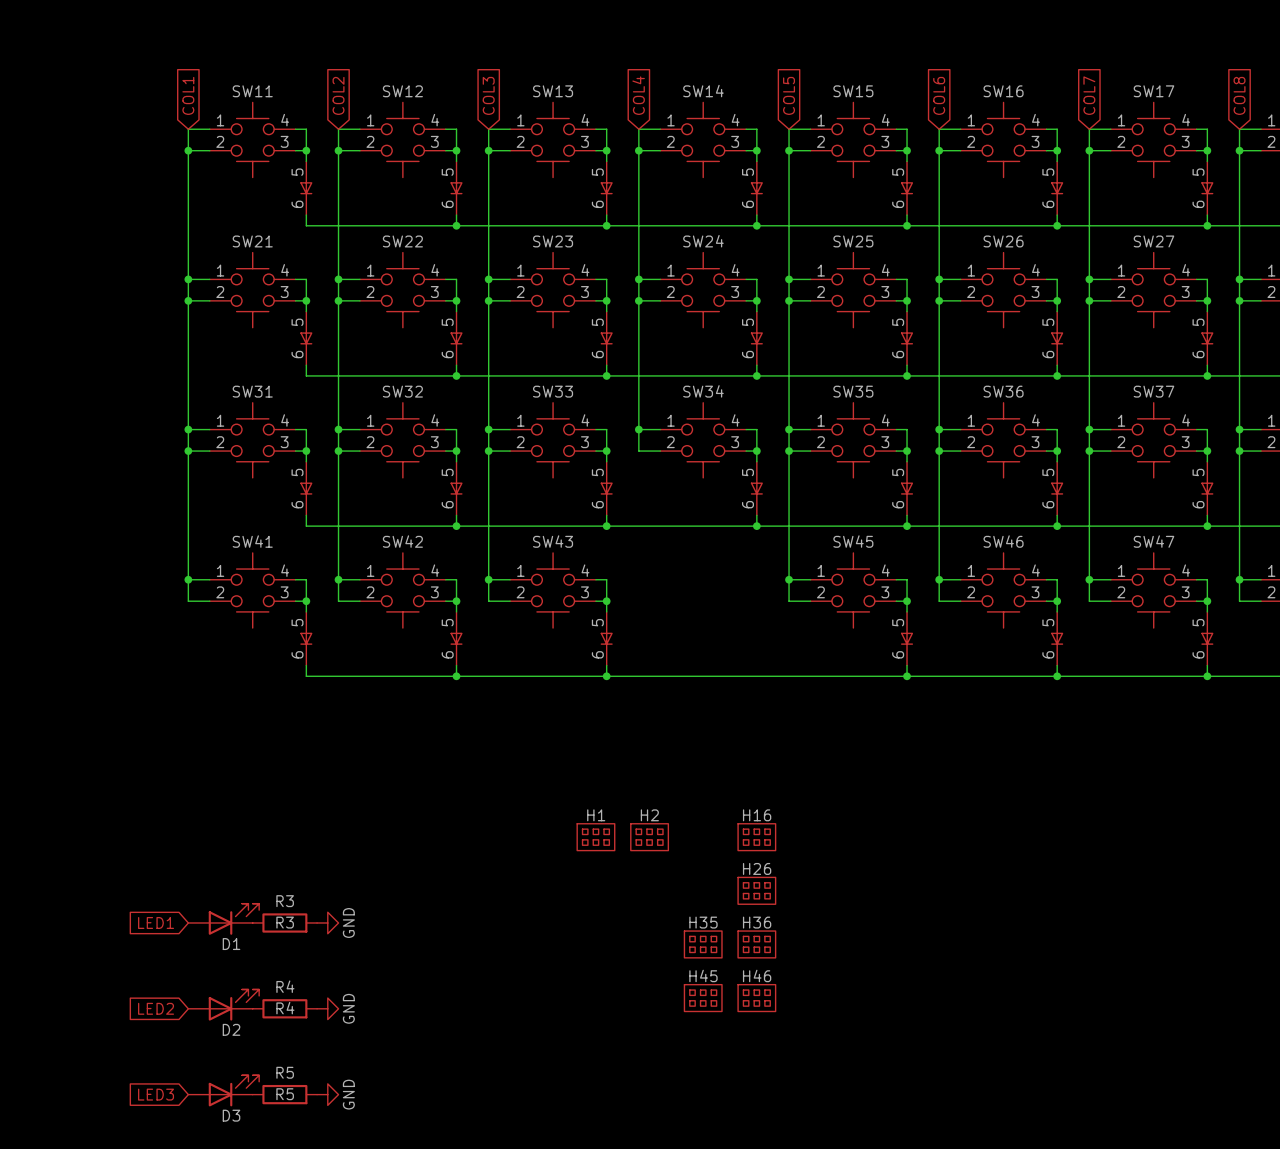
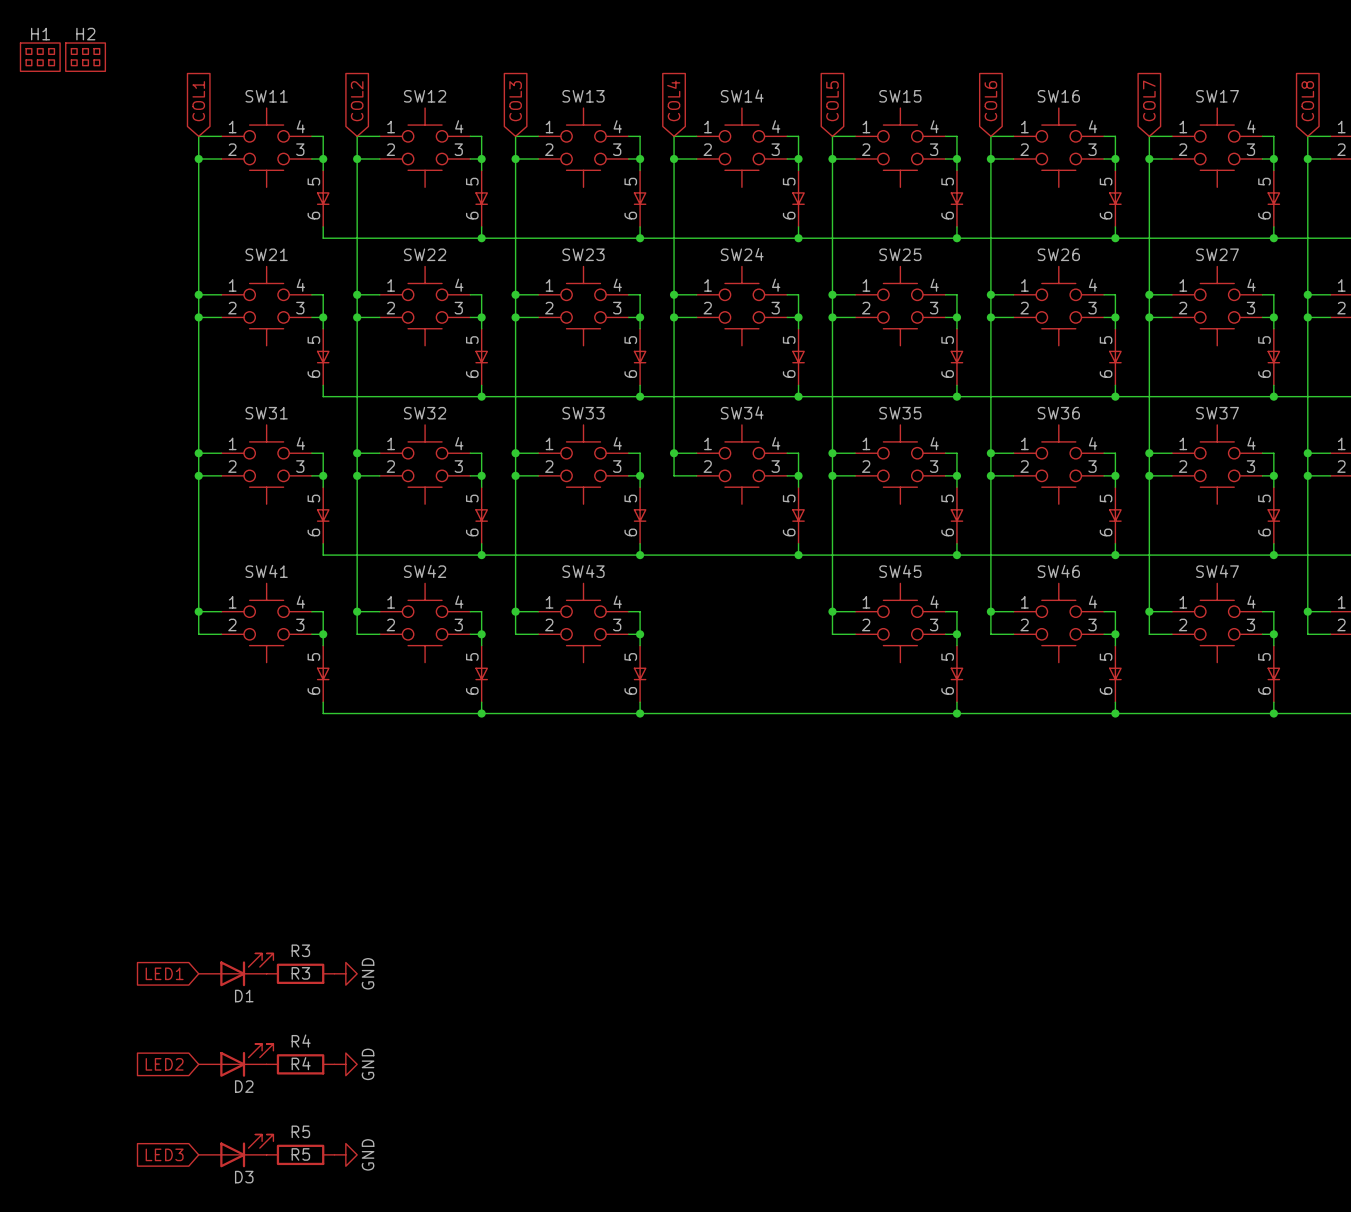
H1 position: (595, 837) -> (40, 57)
H2 position: (649, 837) -> (85, 57)
H16: (756, 837) -> none
H26: (756, 890) -> none
H35: (703, 944) -> none
H36: (756, 944) -> none
H45: (703, 998) -> none
H46: (756, 998) -> none

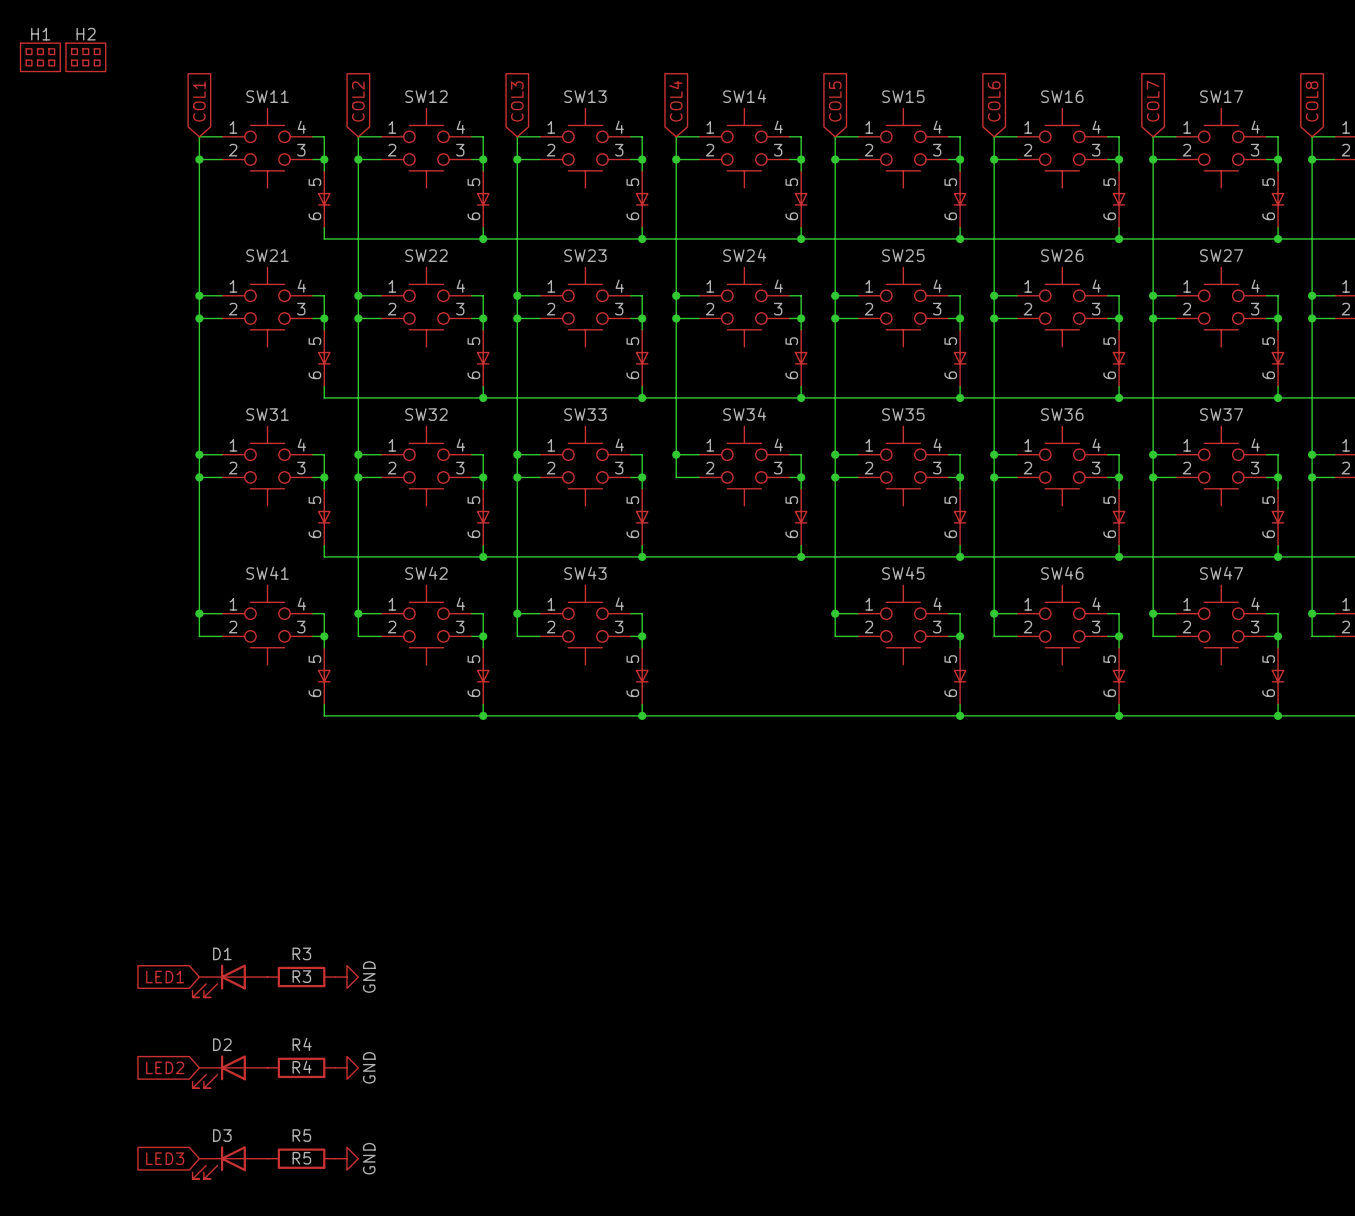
D1 rotation: 0° (246, 969) -> 180° (219, 981)
D2 rotation: 0° (246, 1060) -> 180° (219, 1071)
D3 rotation: 0° (246, 1150) -> 180° (219, 1162)

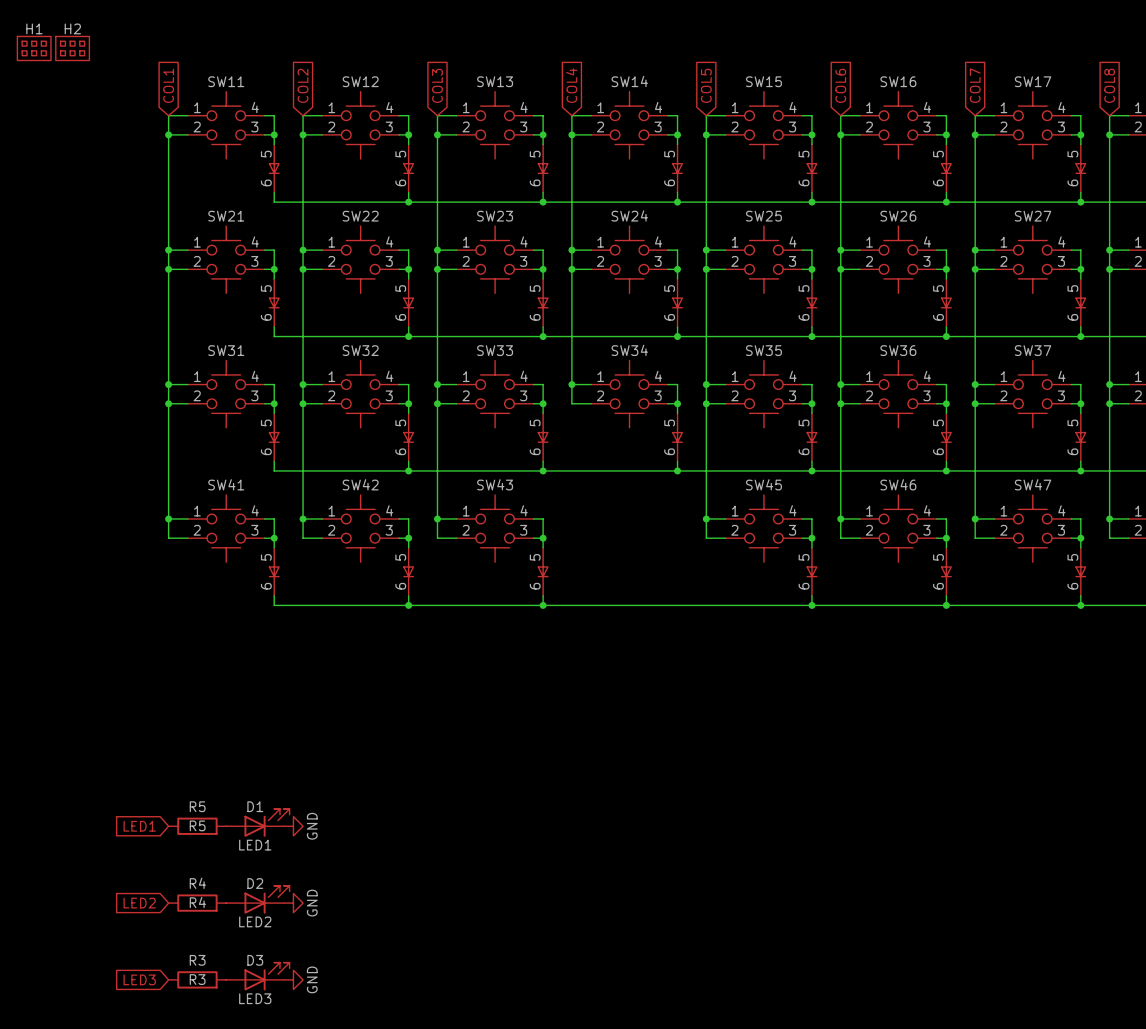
R3 position: (301, 977) -> (197, 979)
D1 rotation: 0° (219, 981) -> 180° (267, 822)
D1 position: (230, 981) -> (257, 822)
D1 value: none -> LED1 (255, 845)
R4 position: (301, 1067) -> (197, 903)
D2 rotation: 0° (219, 1071) -> 180° (267, 899)
D2 position: (230, 1071) -> (257, 899)
D2 value: none -> LED2 (255, 921)
R5 position: (301, 1158) -> (197, 826)
D3 rotation: 0° (219, 1162) -> 180° (267, 976)
D3 position: (230, 1162) -> (257, 976)
D3 value: none -> LED3 (255, 998)

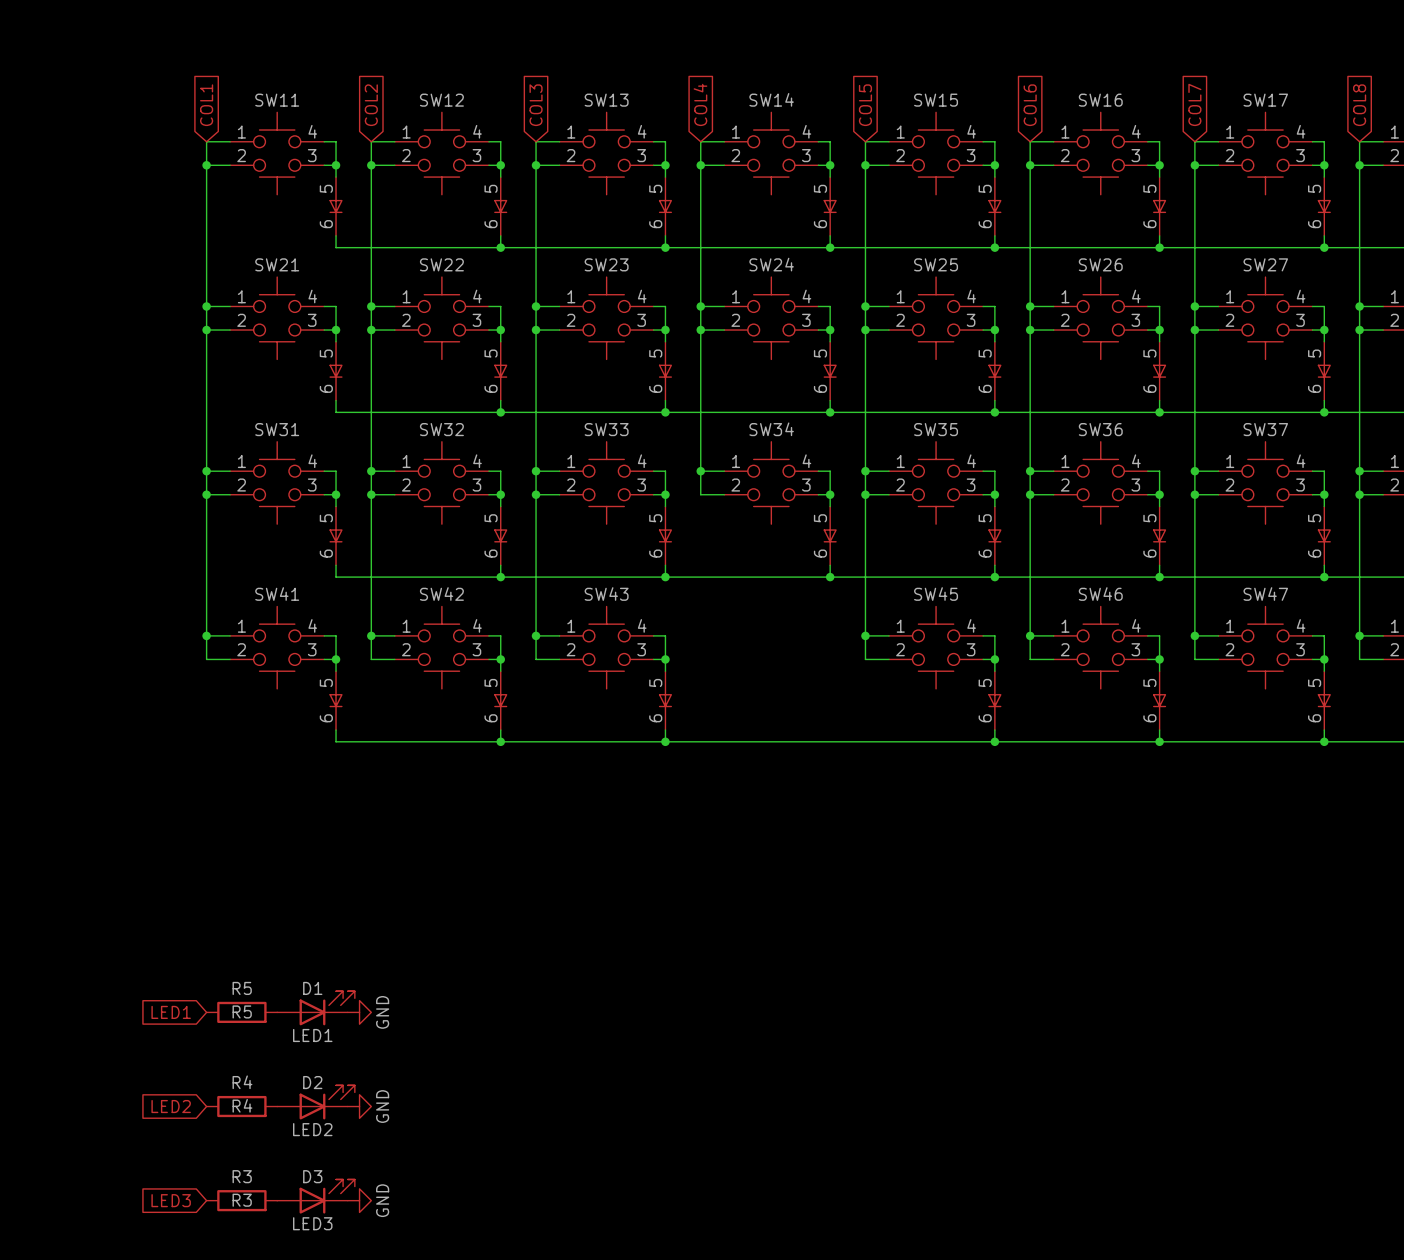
H1: (34, 48) -> none
H2: (72, 48) -> none

